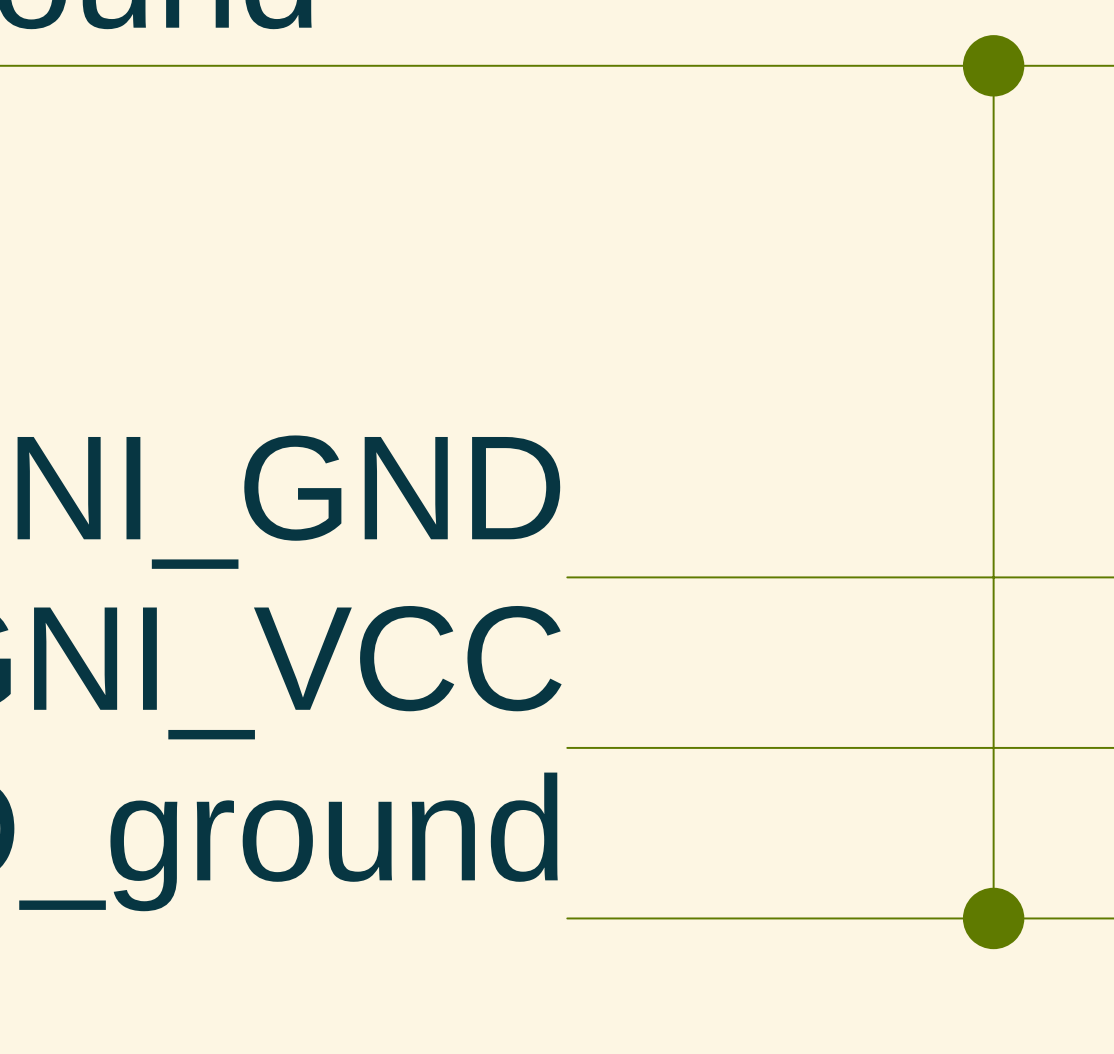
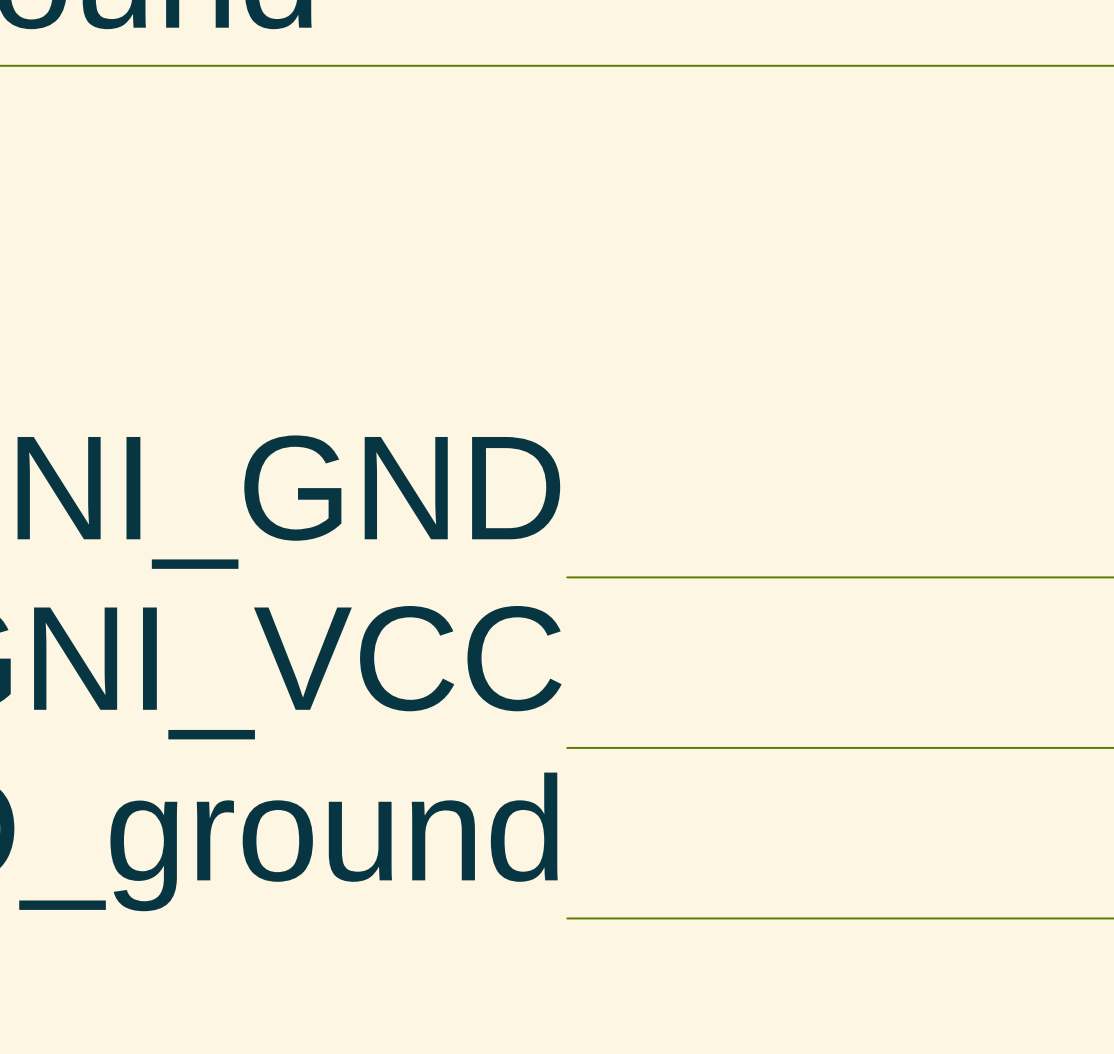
wire: (993, 65) (993, 918) -> none
junction: (993, 65) -> none
junction: (993, 918) -> none

